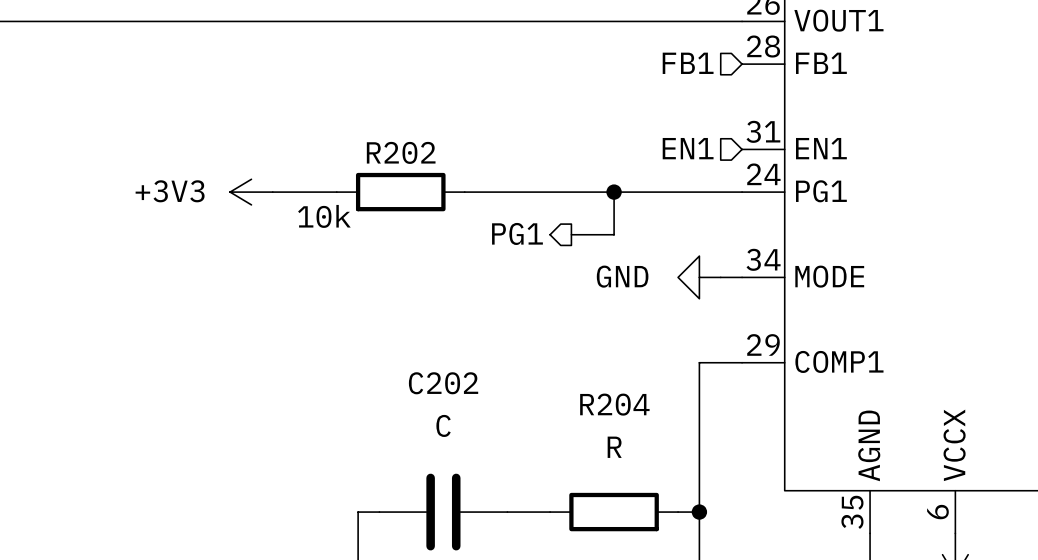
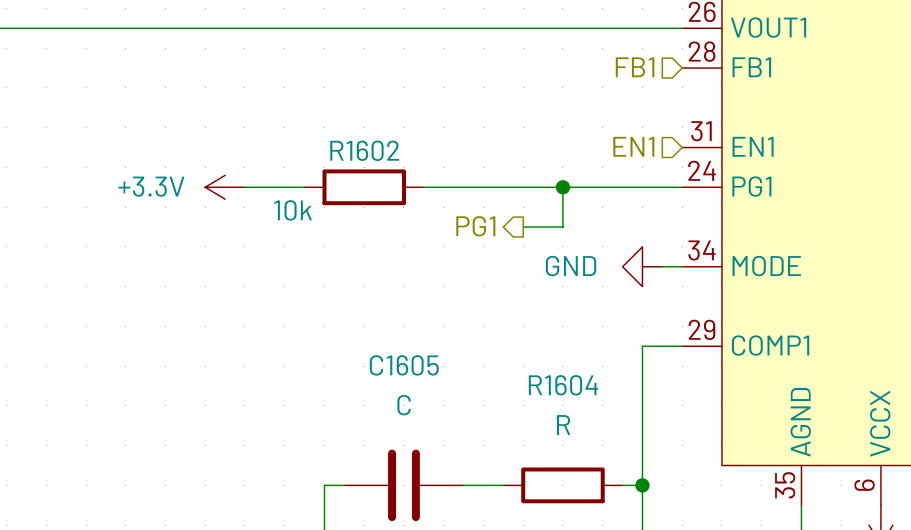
R202 name: R202 (401, 152) -> R1602 (364, 150)
power symbol: +3V3 (251, 192) -> +3.3V (225, 187)
C202 name: C202 (443, 383) -> C1605 (404, 365)
R204 name: R204 (614, 404) -> R1604 (563, 385)

